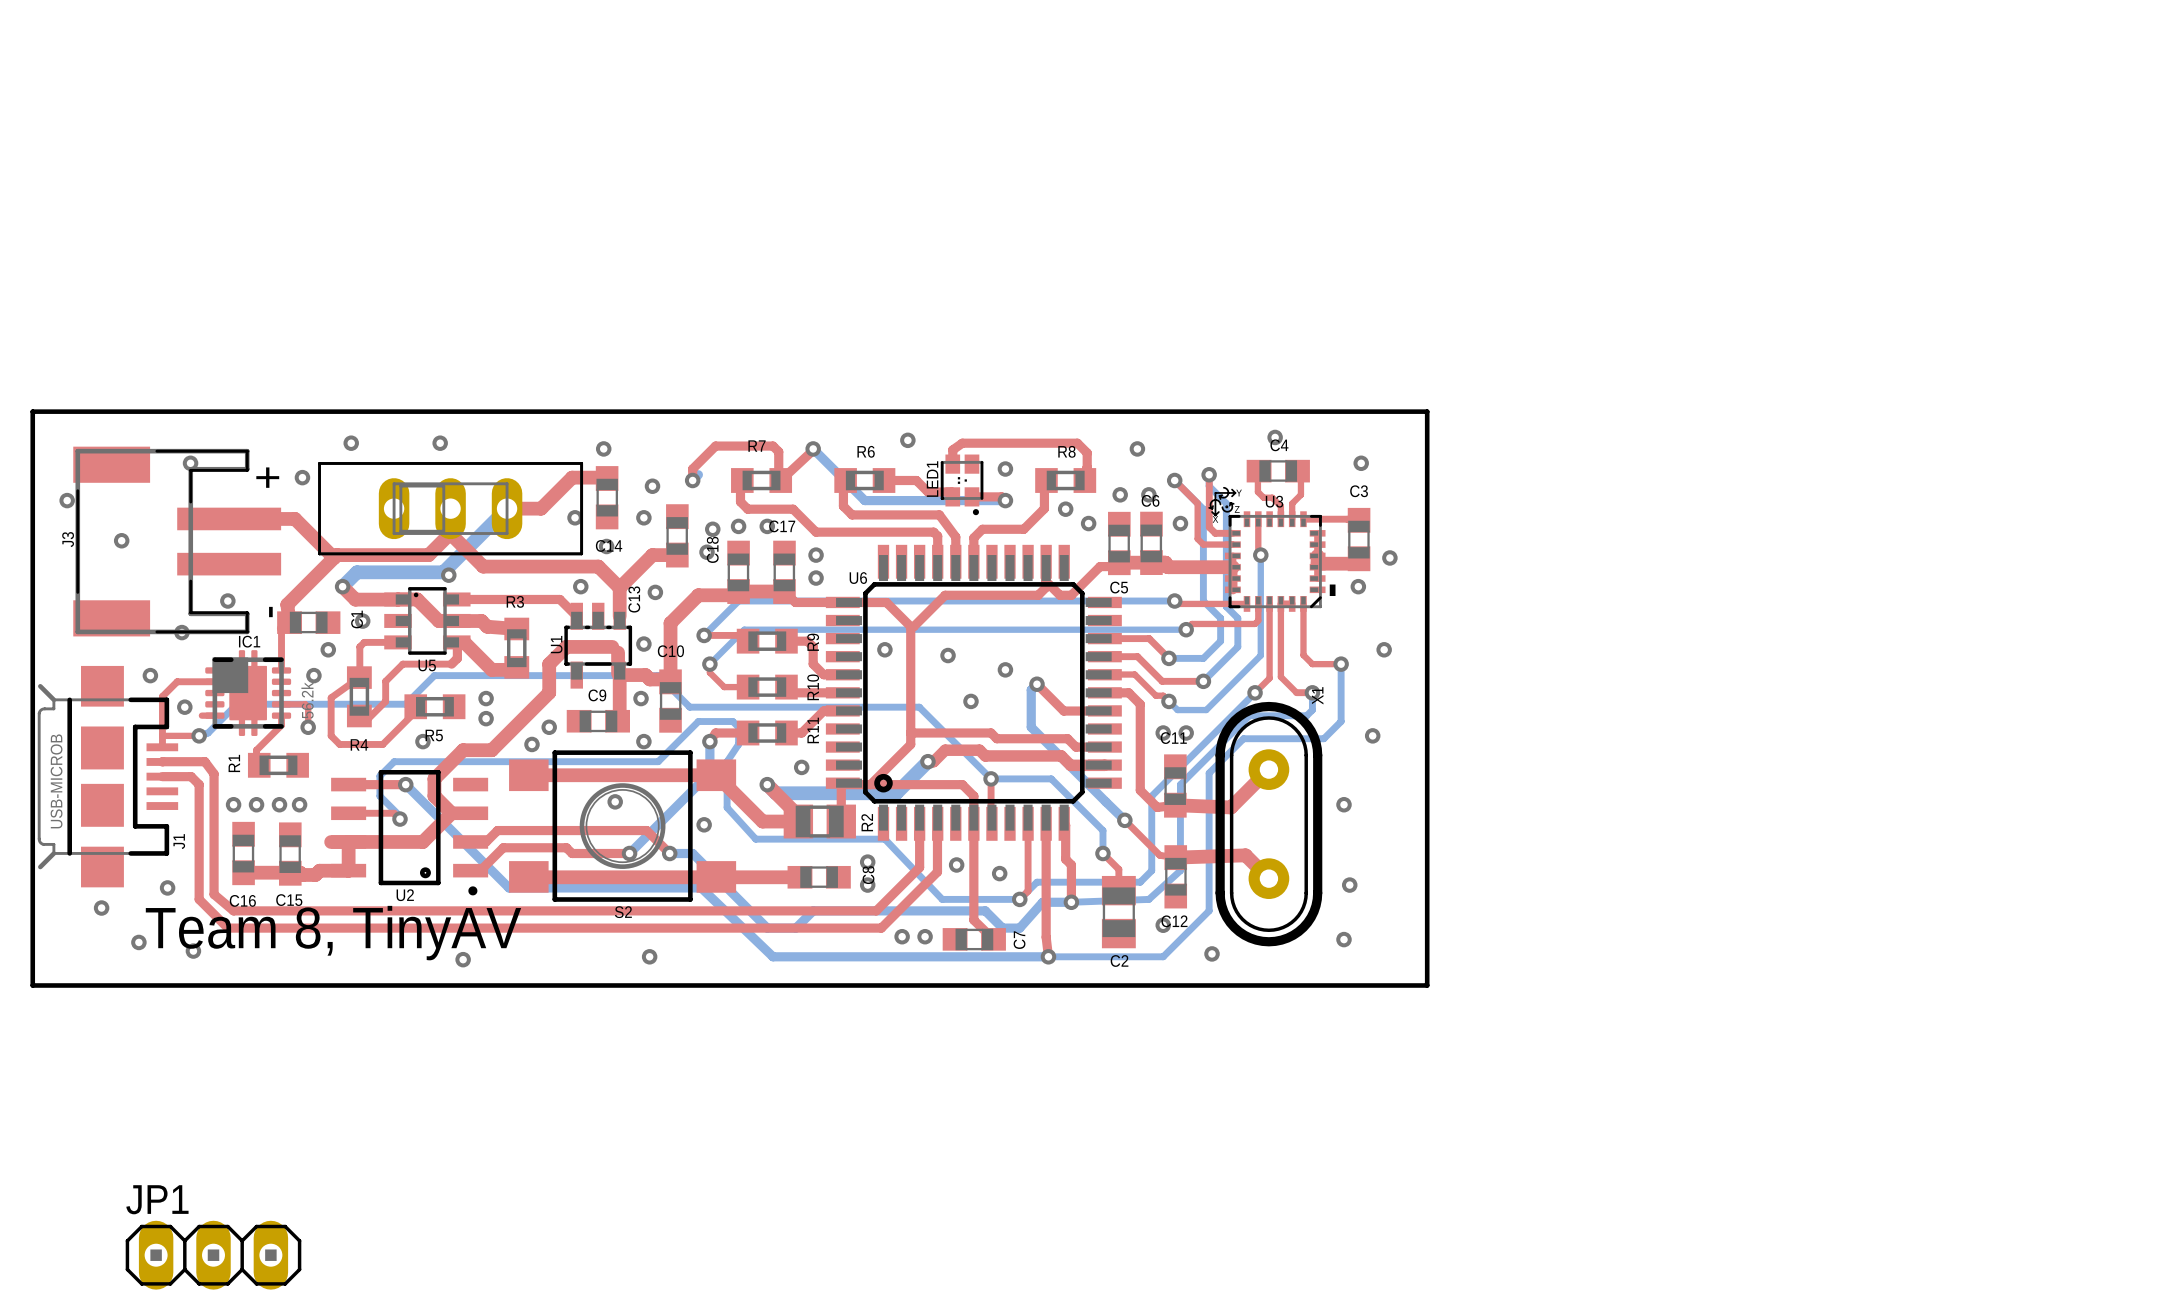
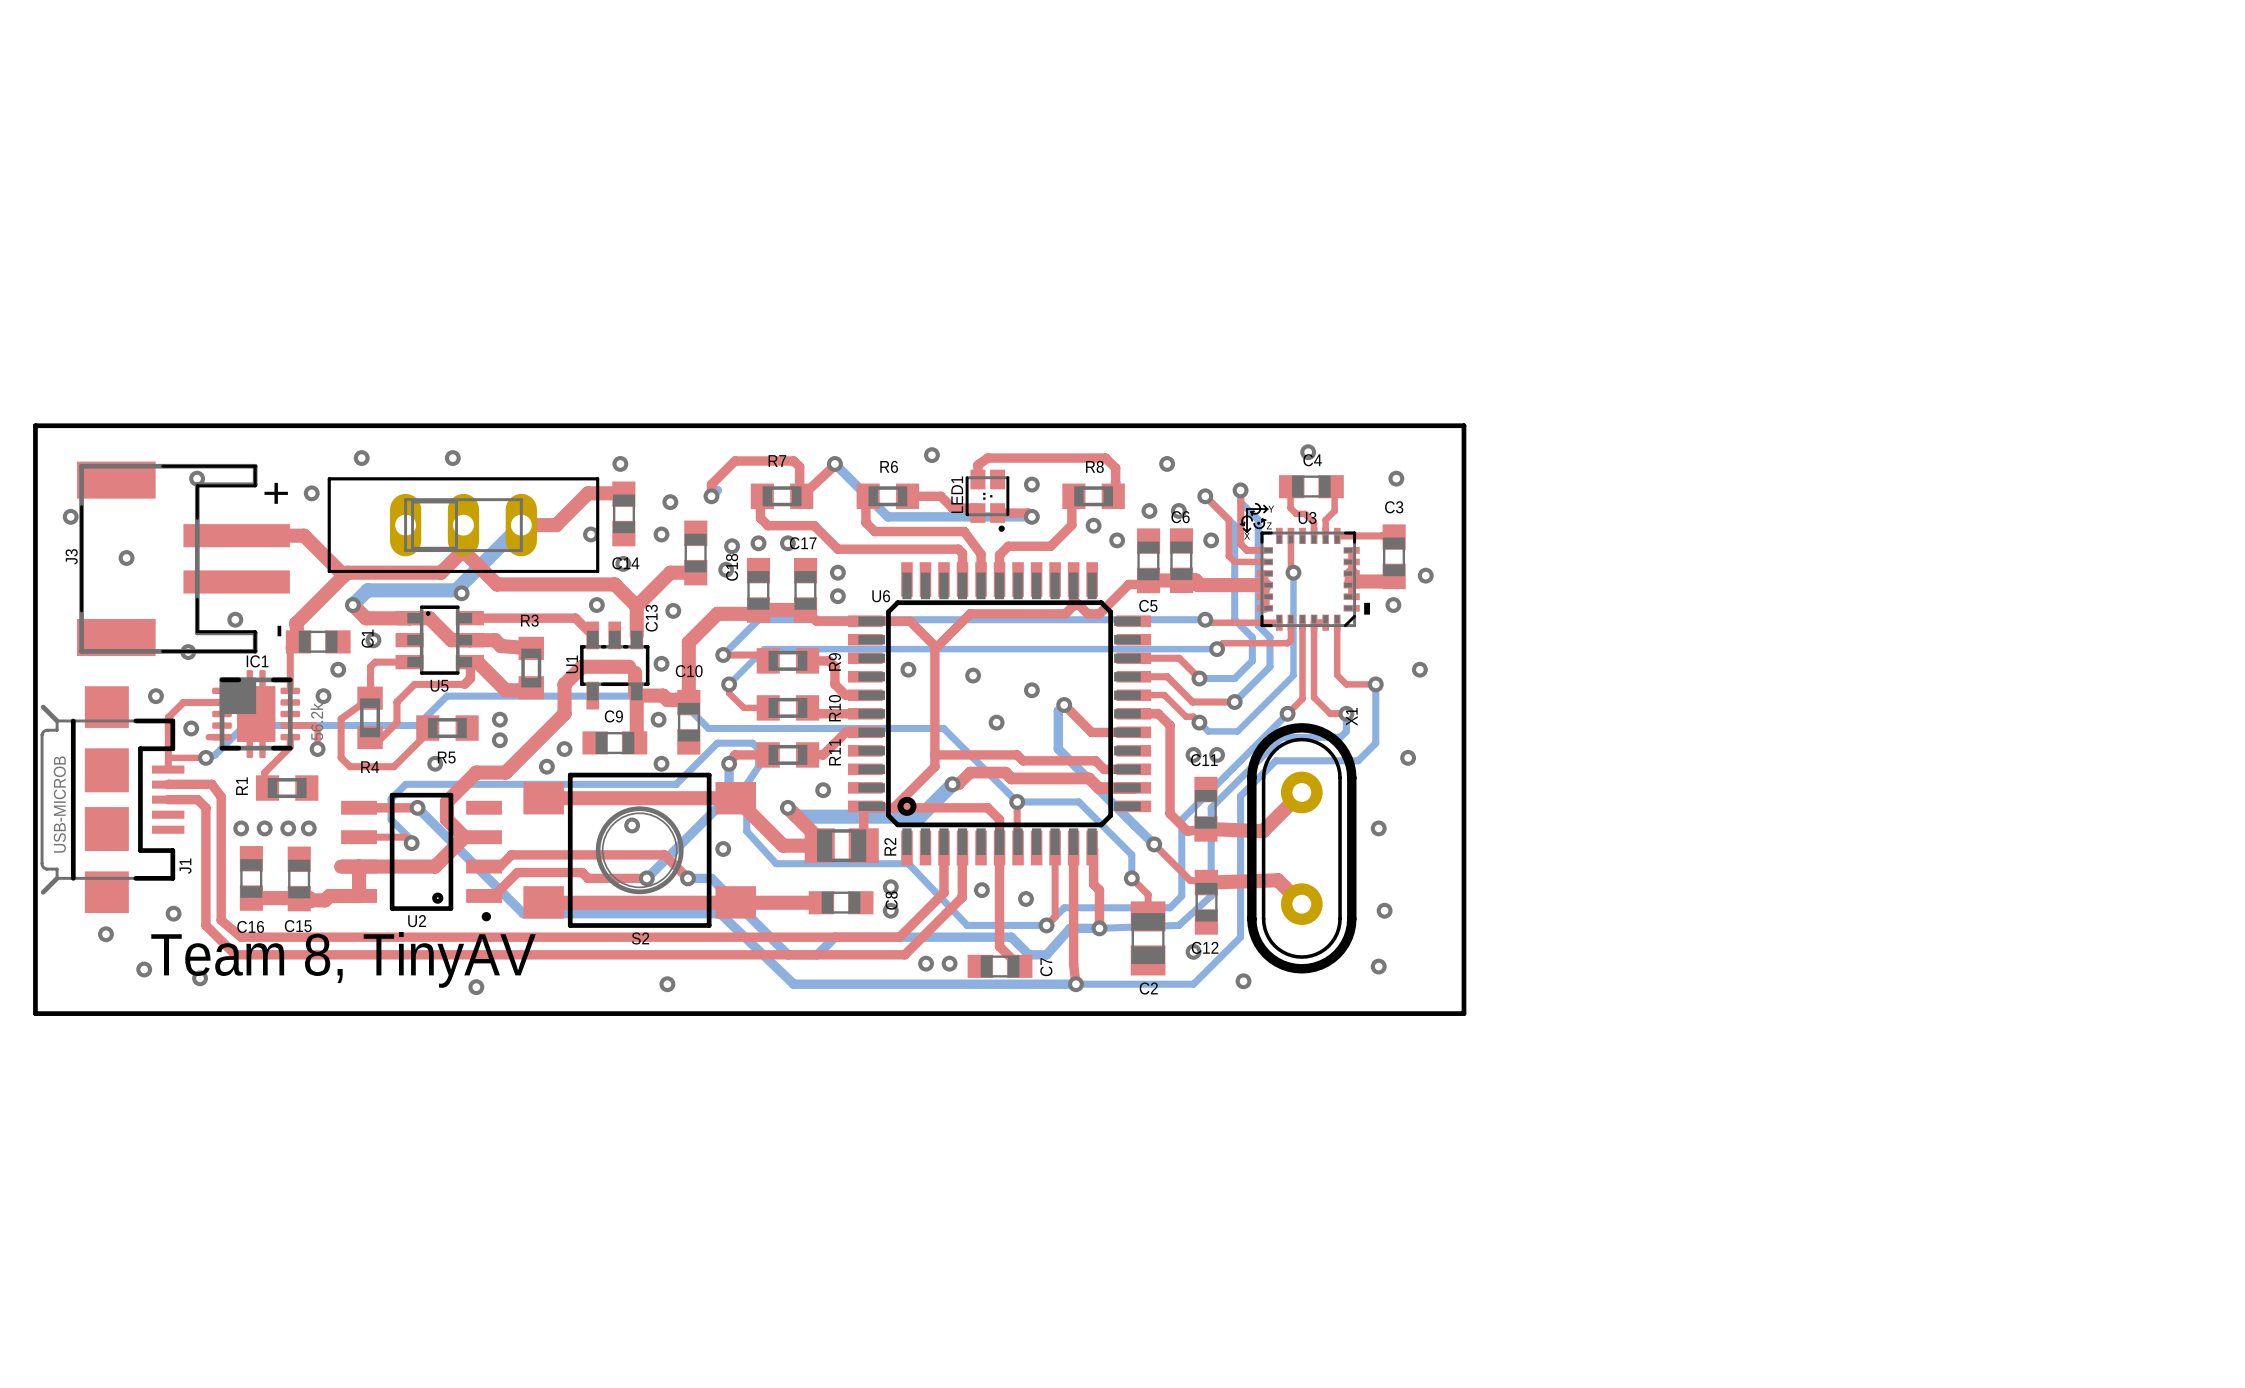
JP1: (213, 1255) -> none

